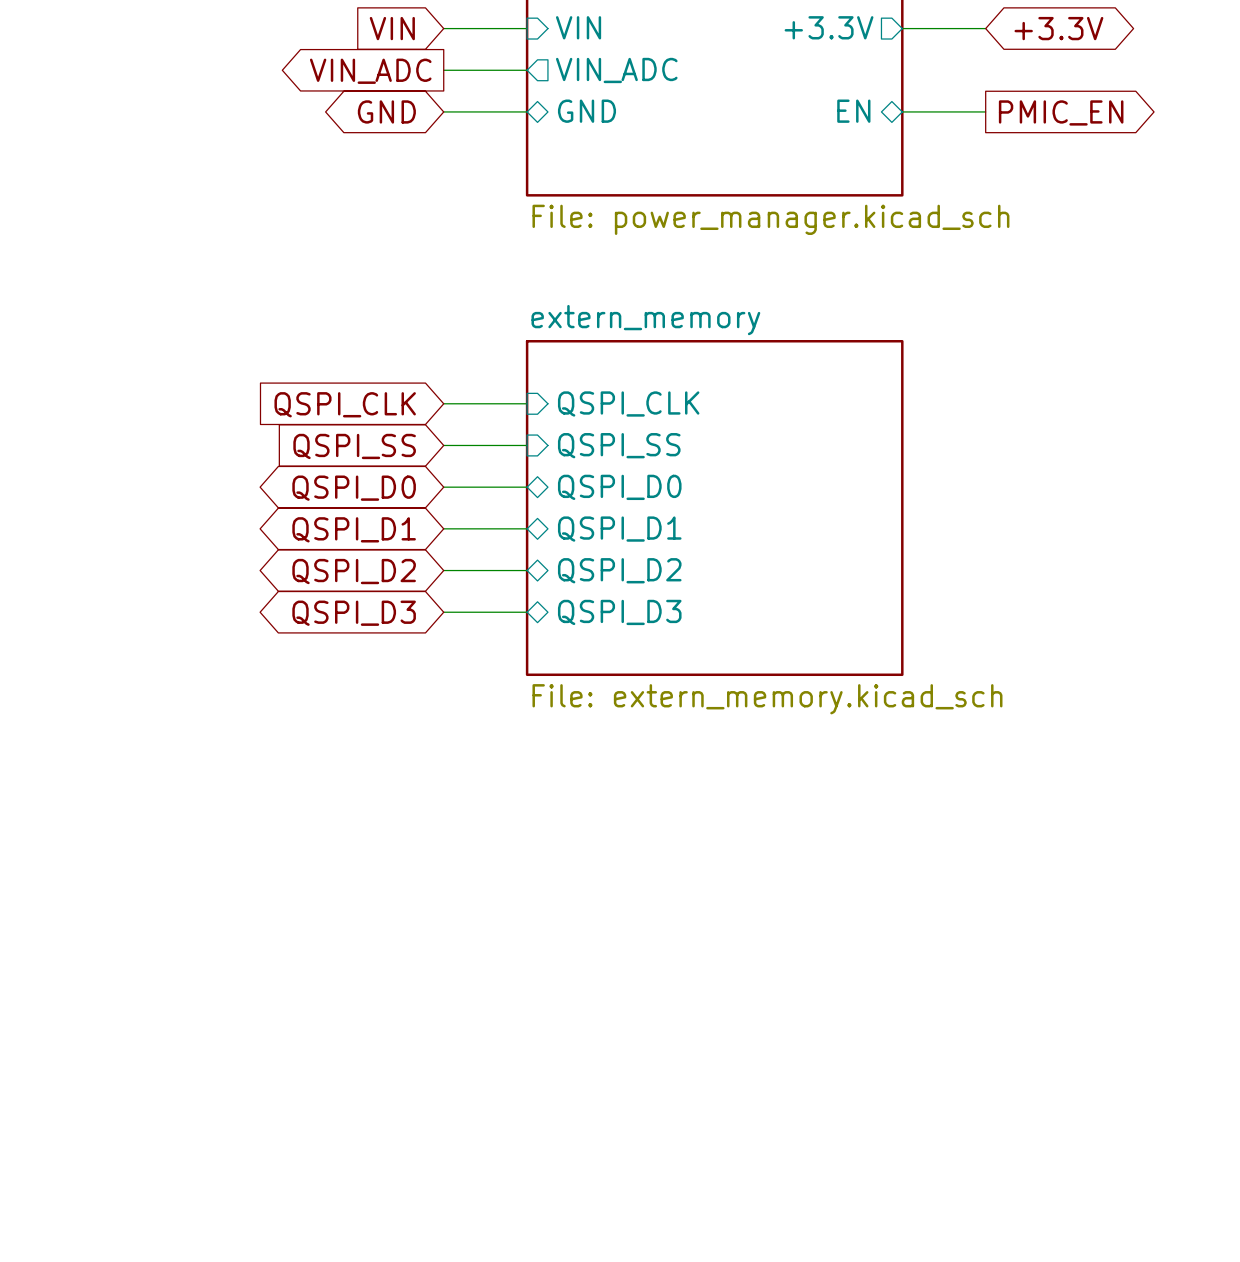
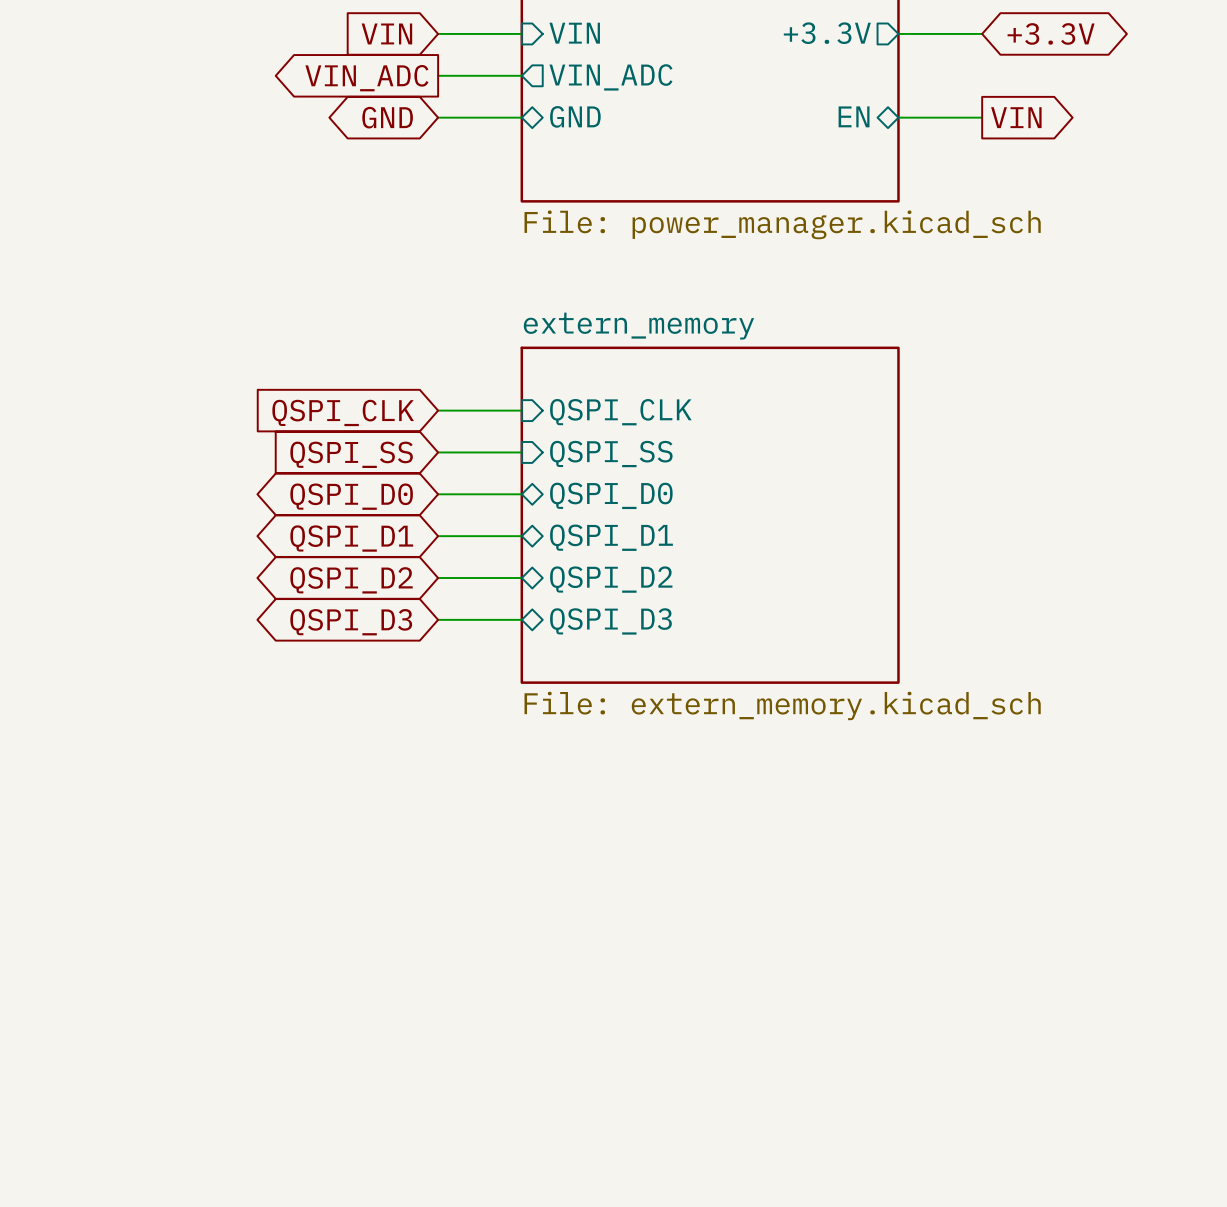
global label: PMIC_EN (1061, 112) -> VIN (1016, 117)

